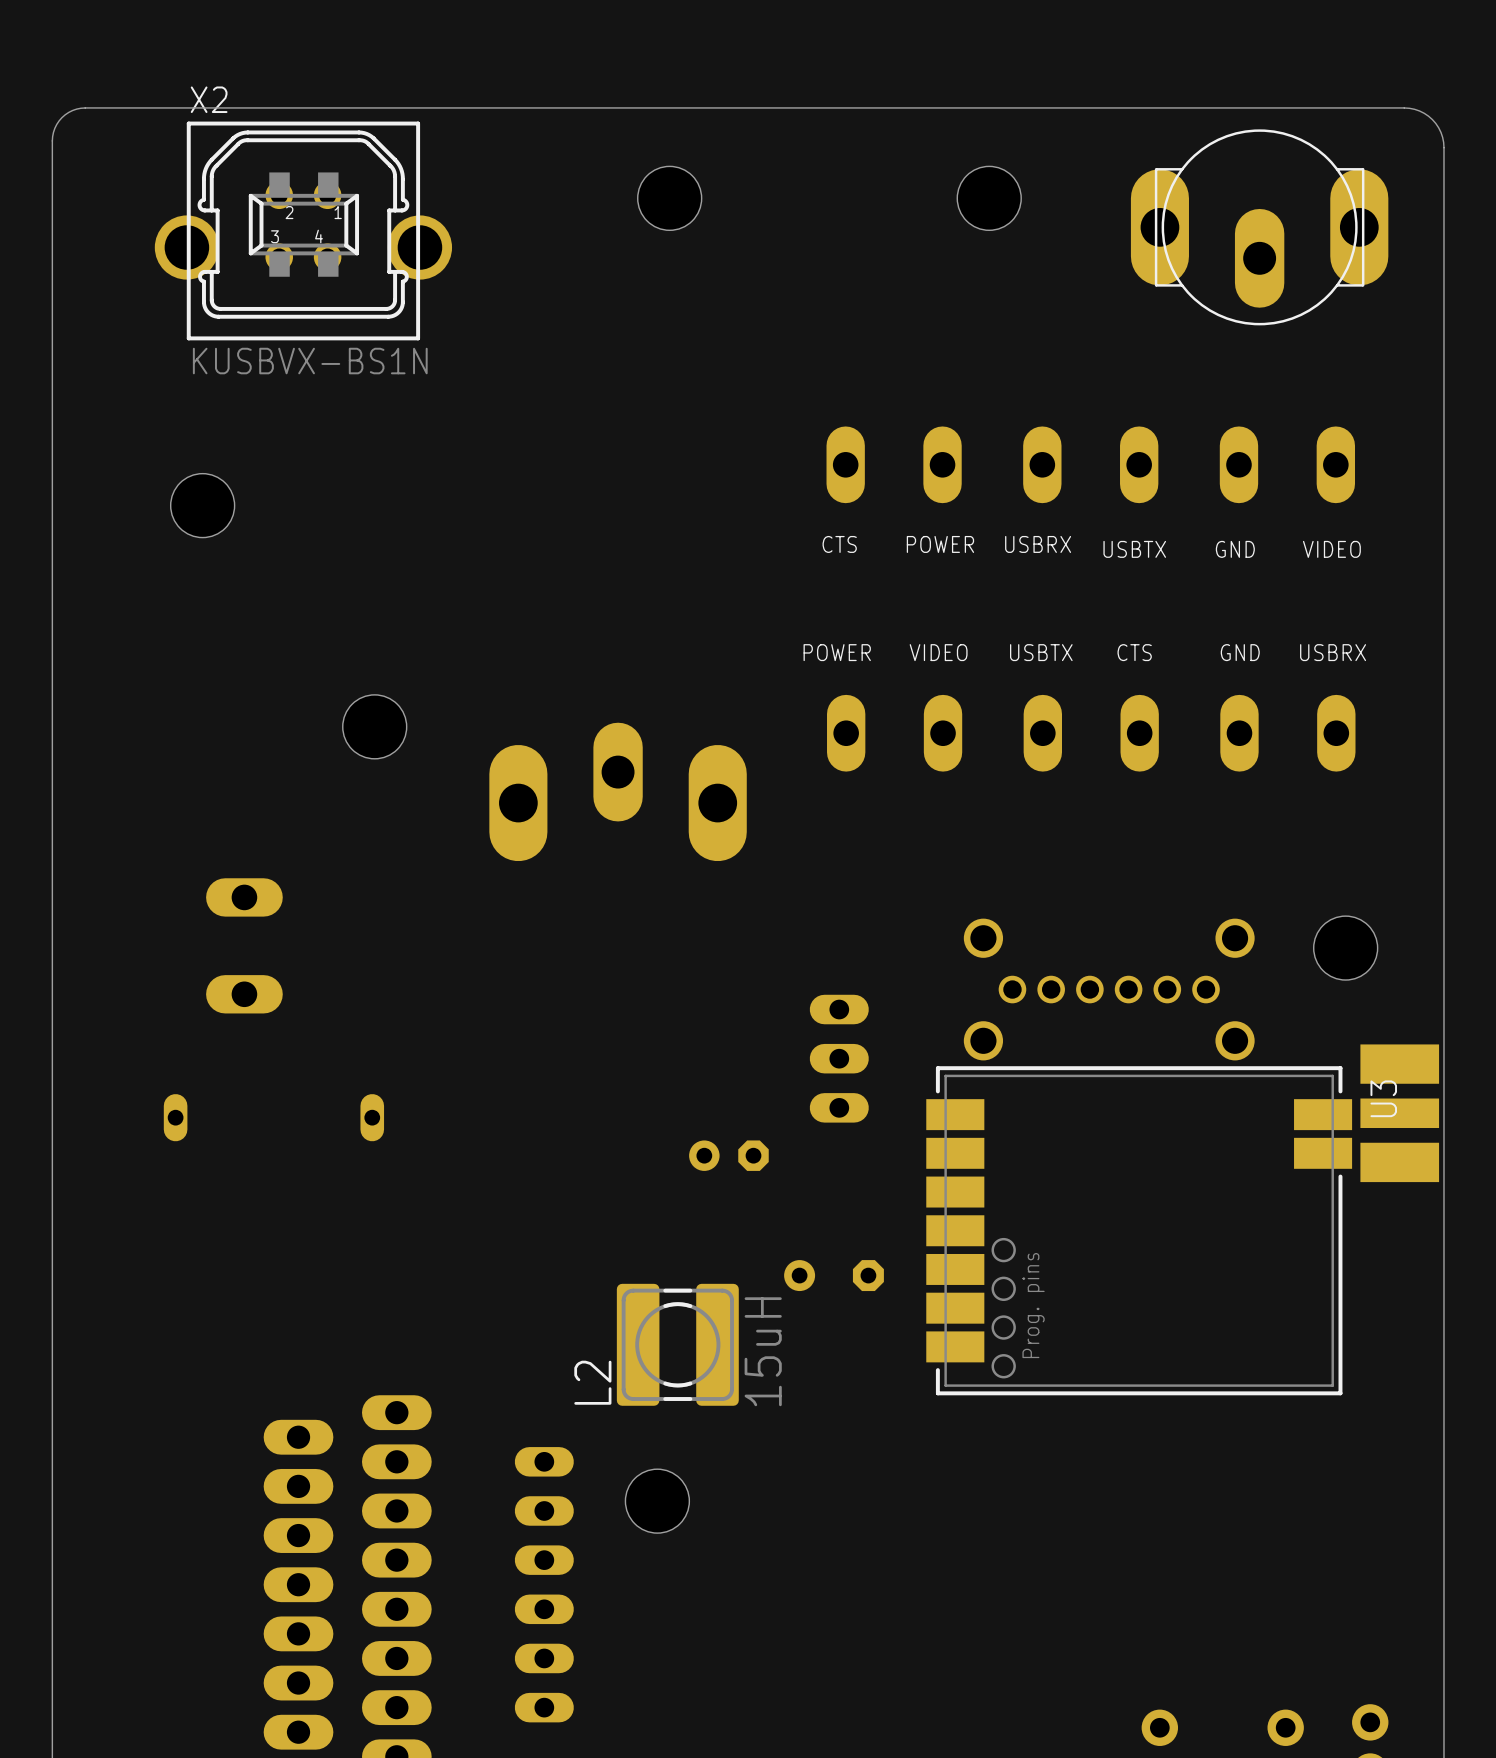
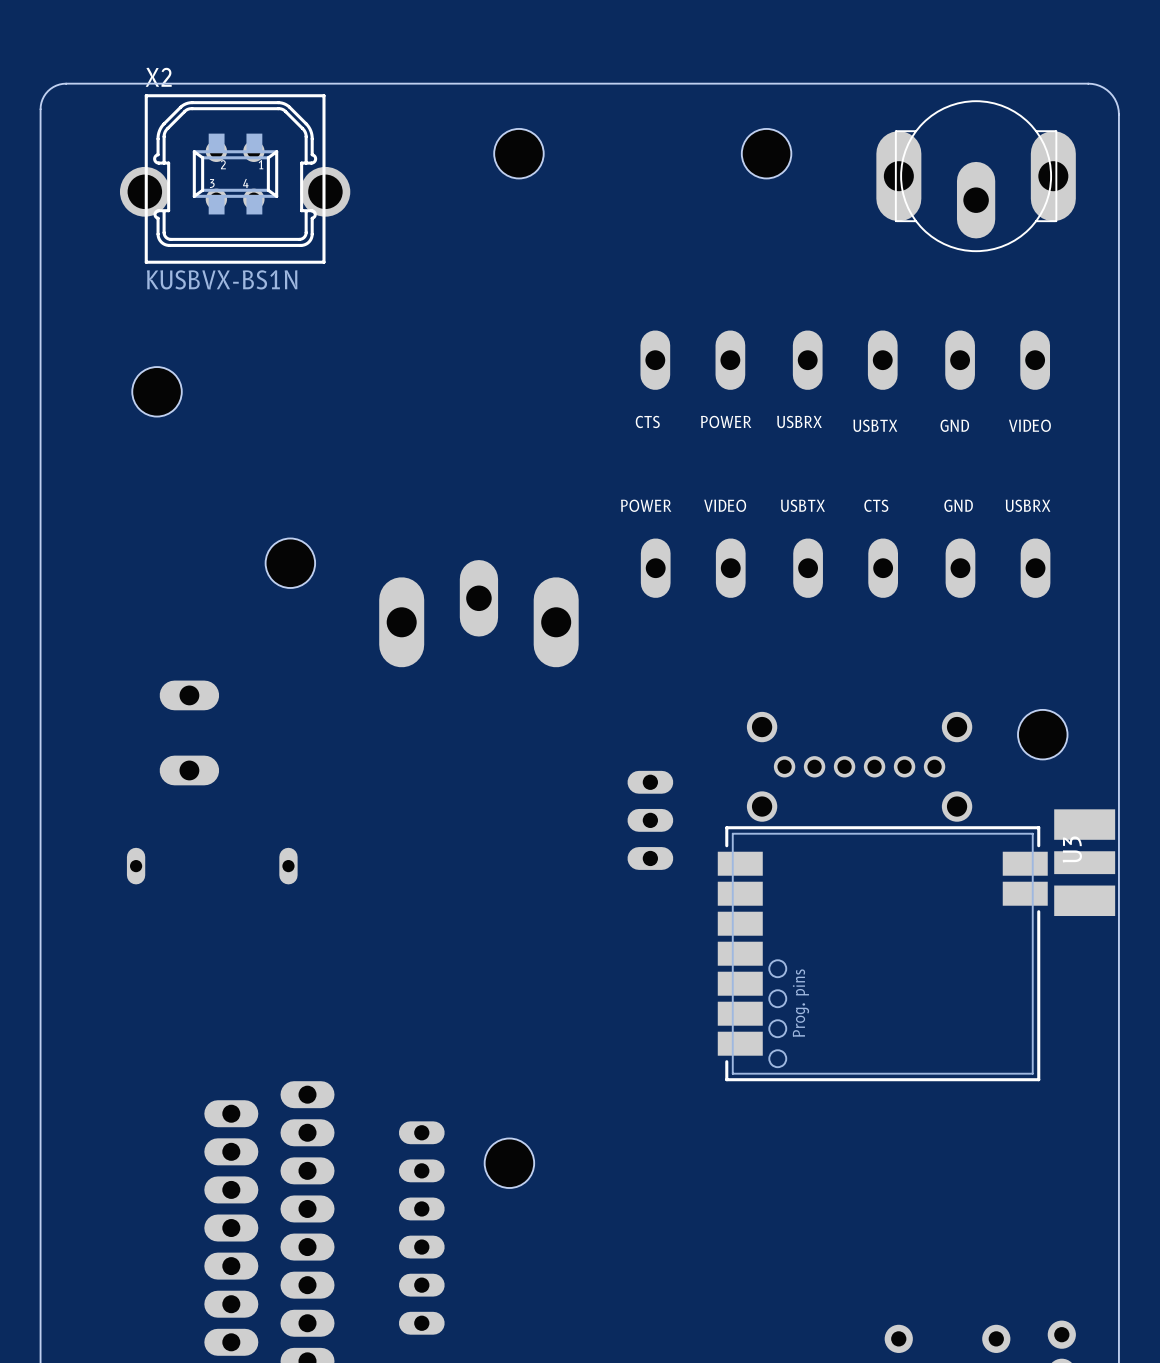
part: (728, 1155) -> none
part: (834, 1275) -> none
L2: 15uH (677, 1344) -> none

